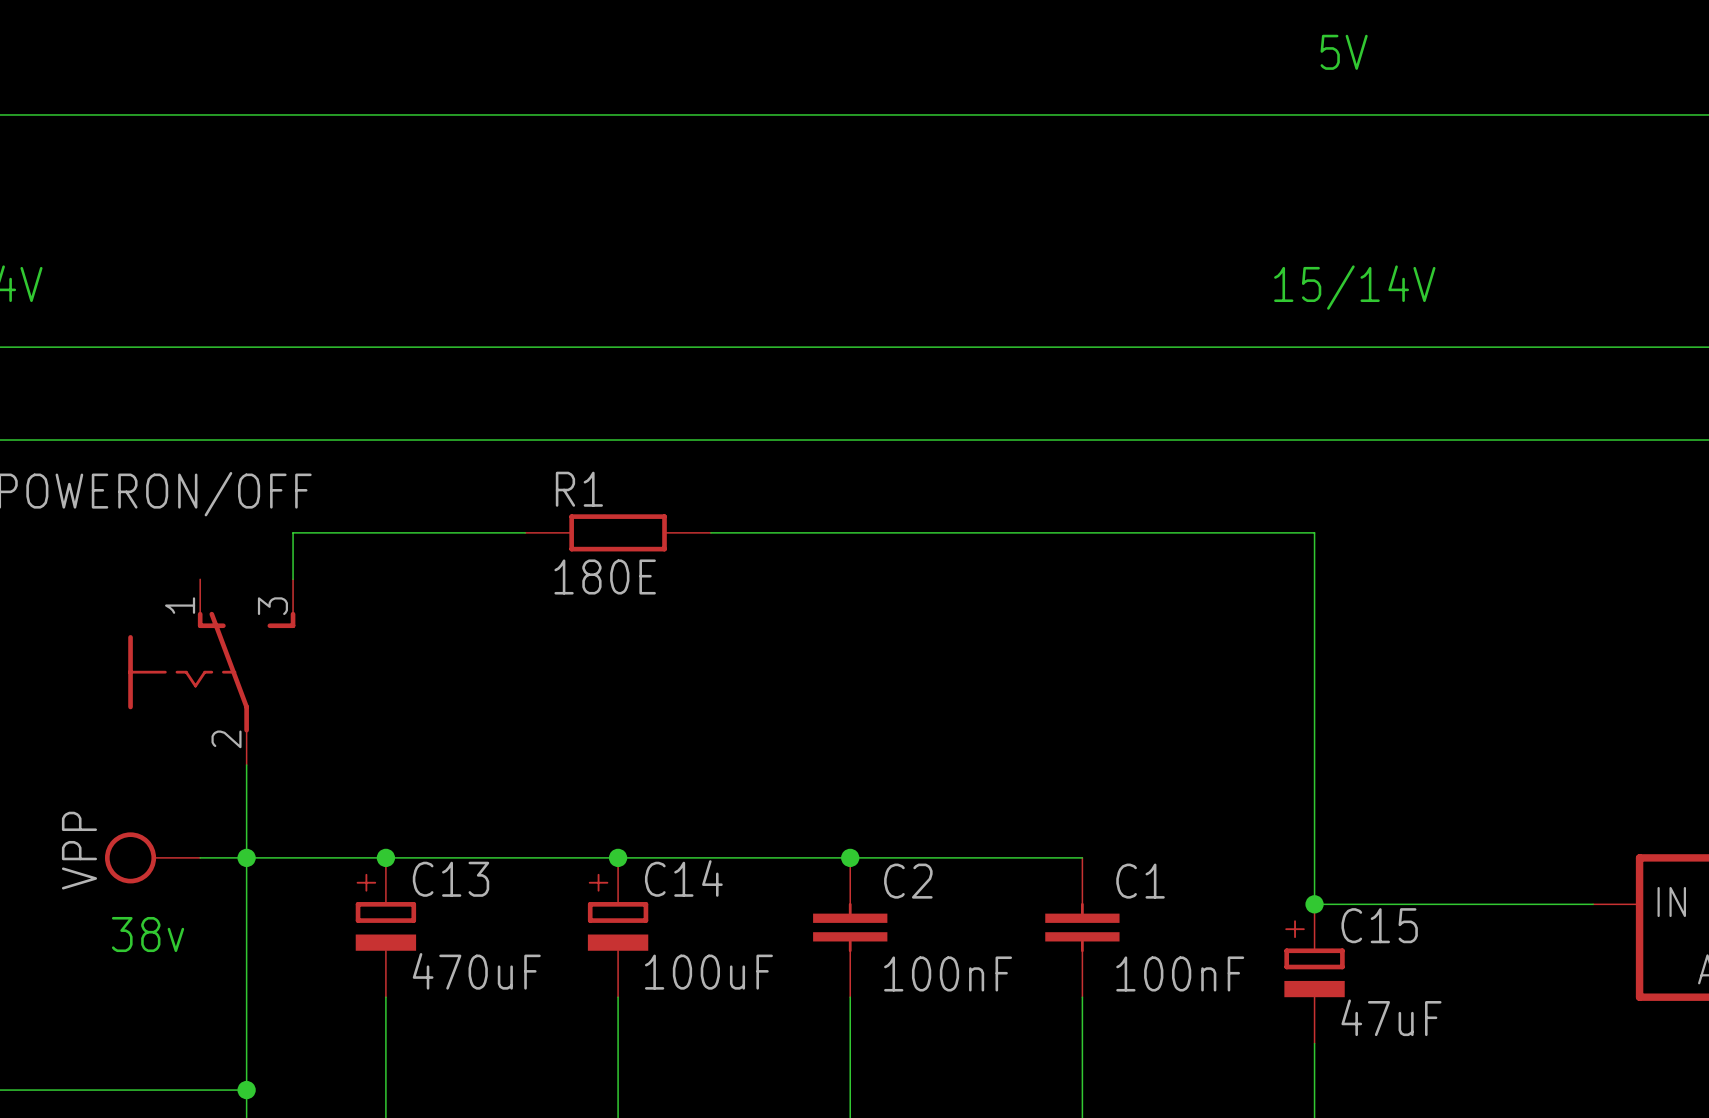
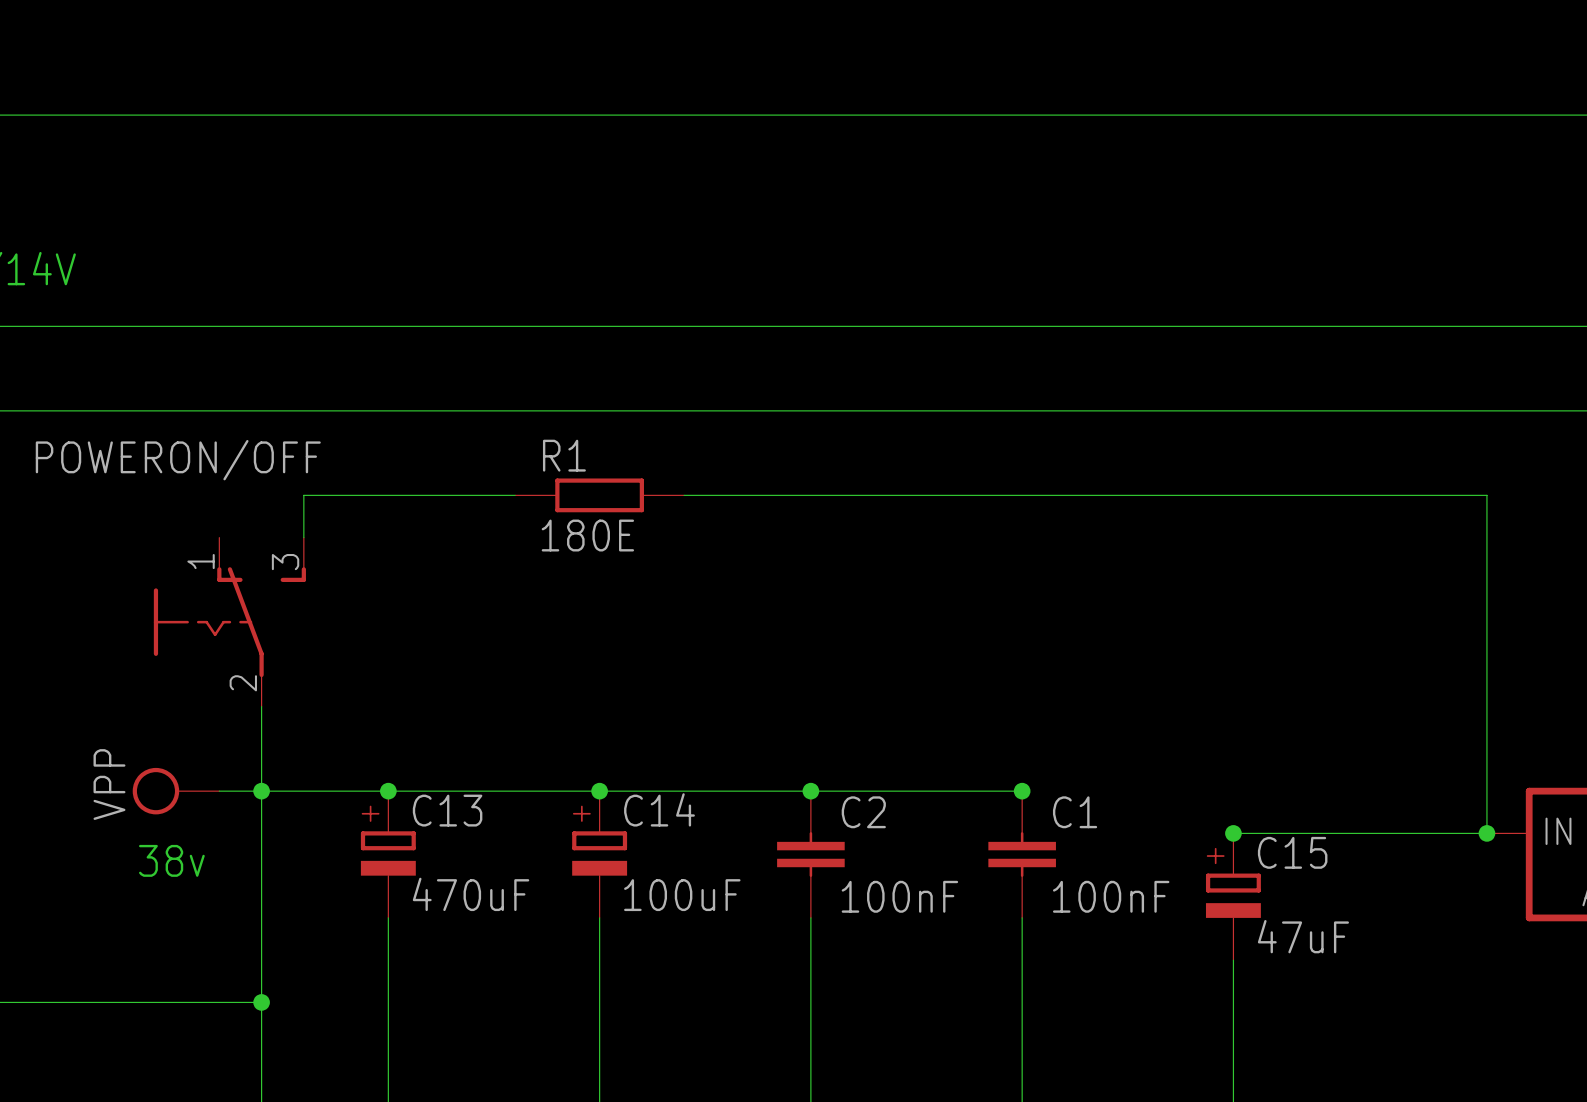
text: 5V (1344, 52) -> none
text: 15/14V (1354, 287) -> none
wire: (1314, 532) (1314, 904) -> (1233, 495) (1486, 495) (1486, 833)
junction: none -> (1022, 791)
junction: none -> (1486, 833)

